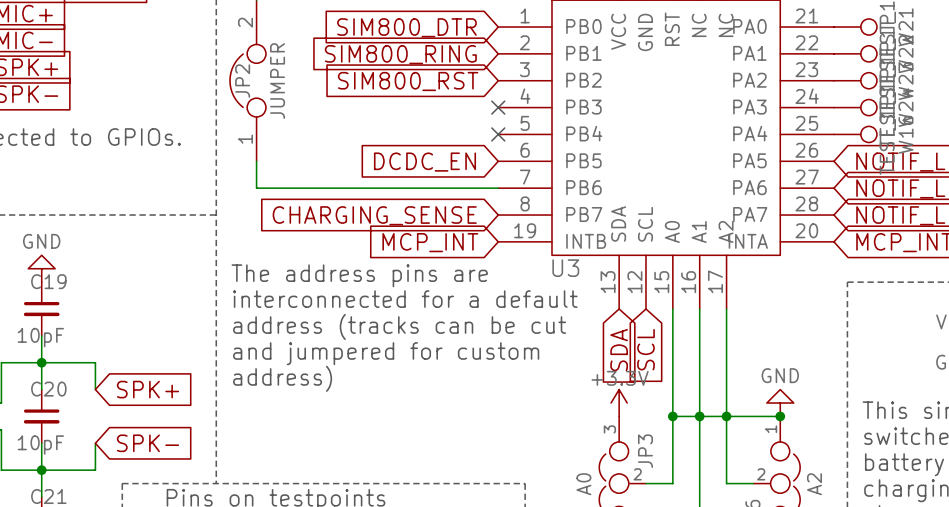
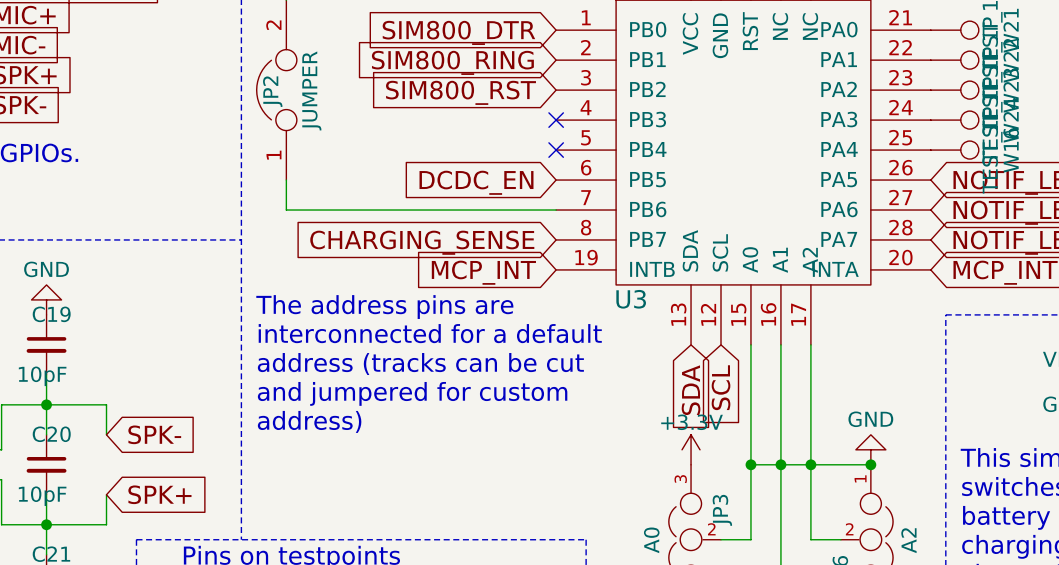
global label: SPK+ (147, 389) -> SPK- (154, 434)
global label: SPK- (147, 443) -> SPK+ (159, 494)

